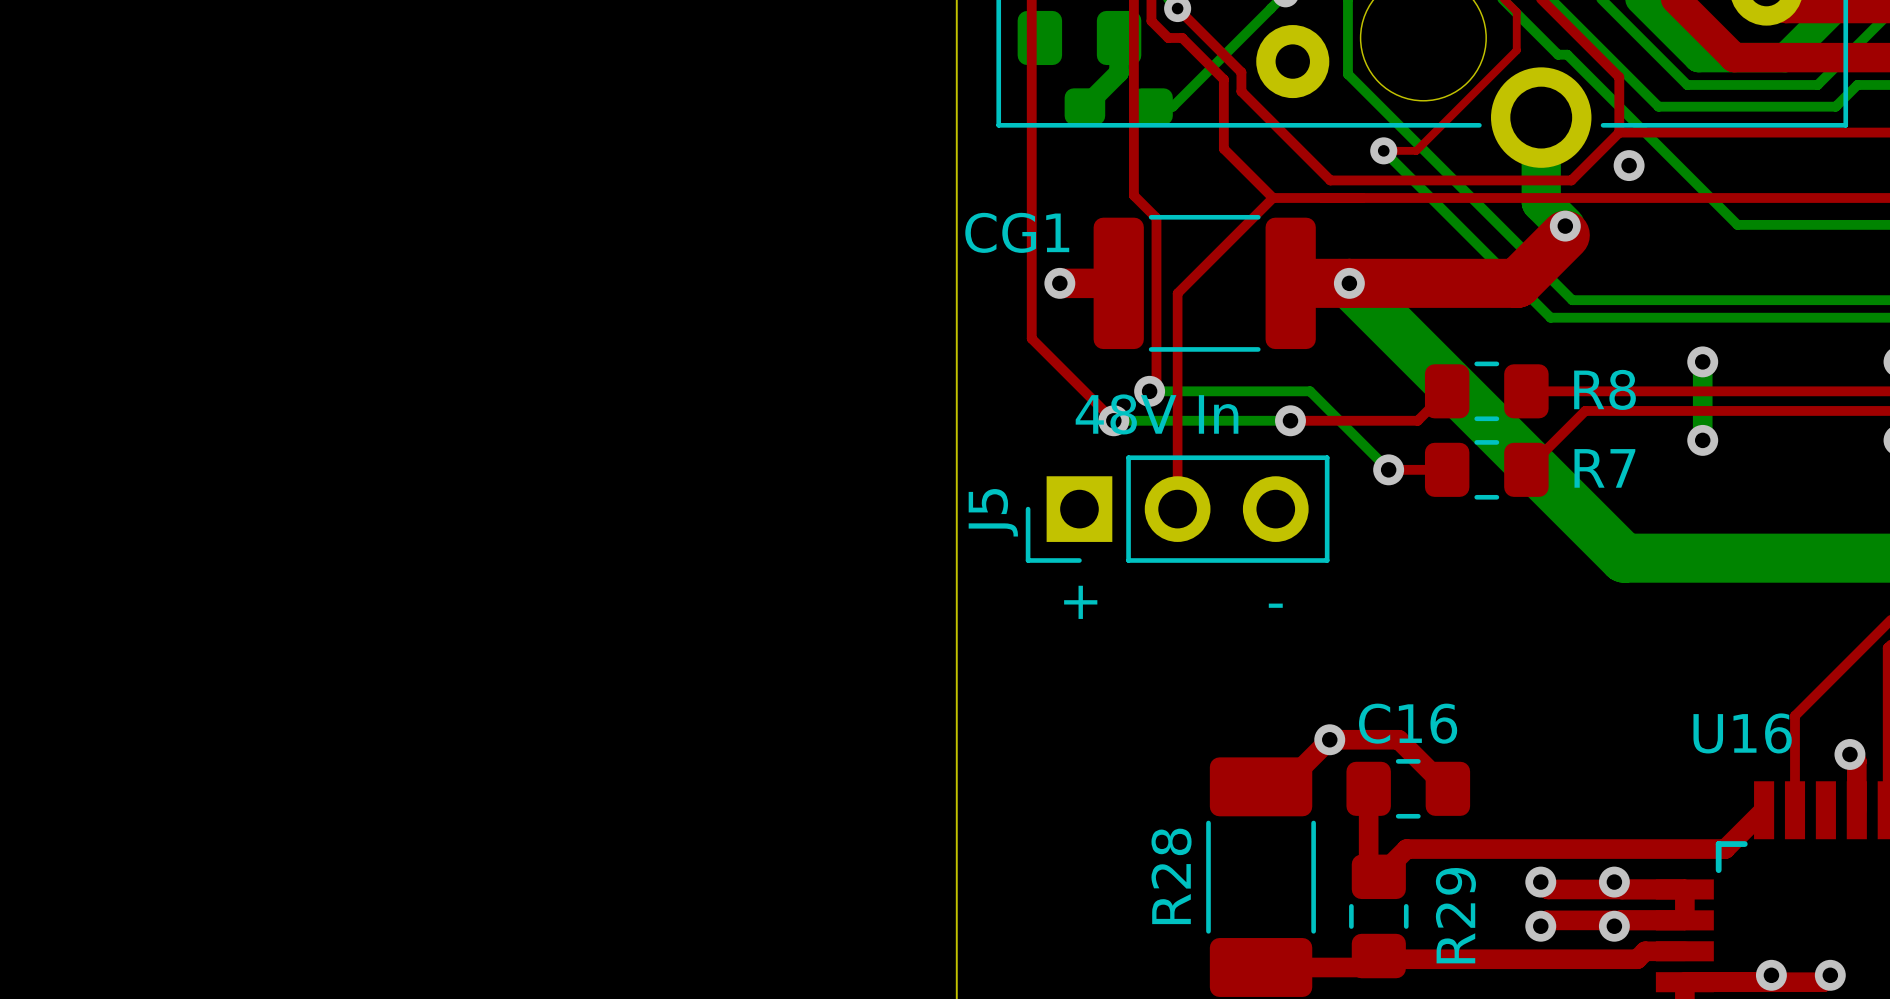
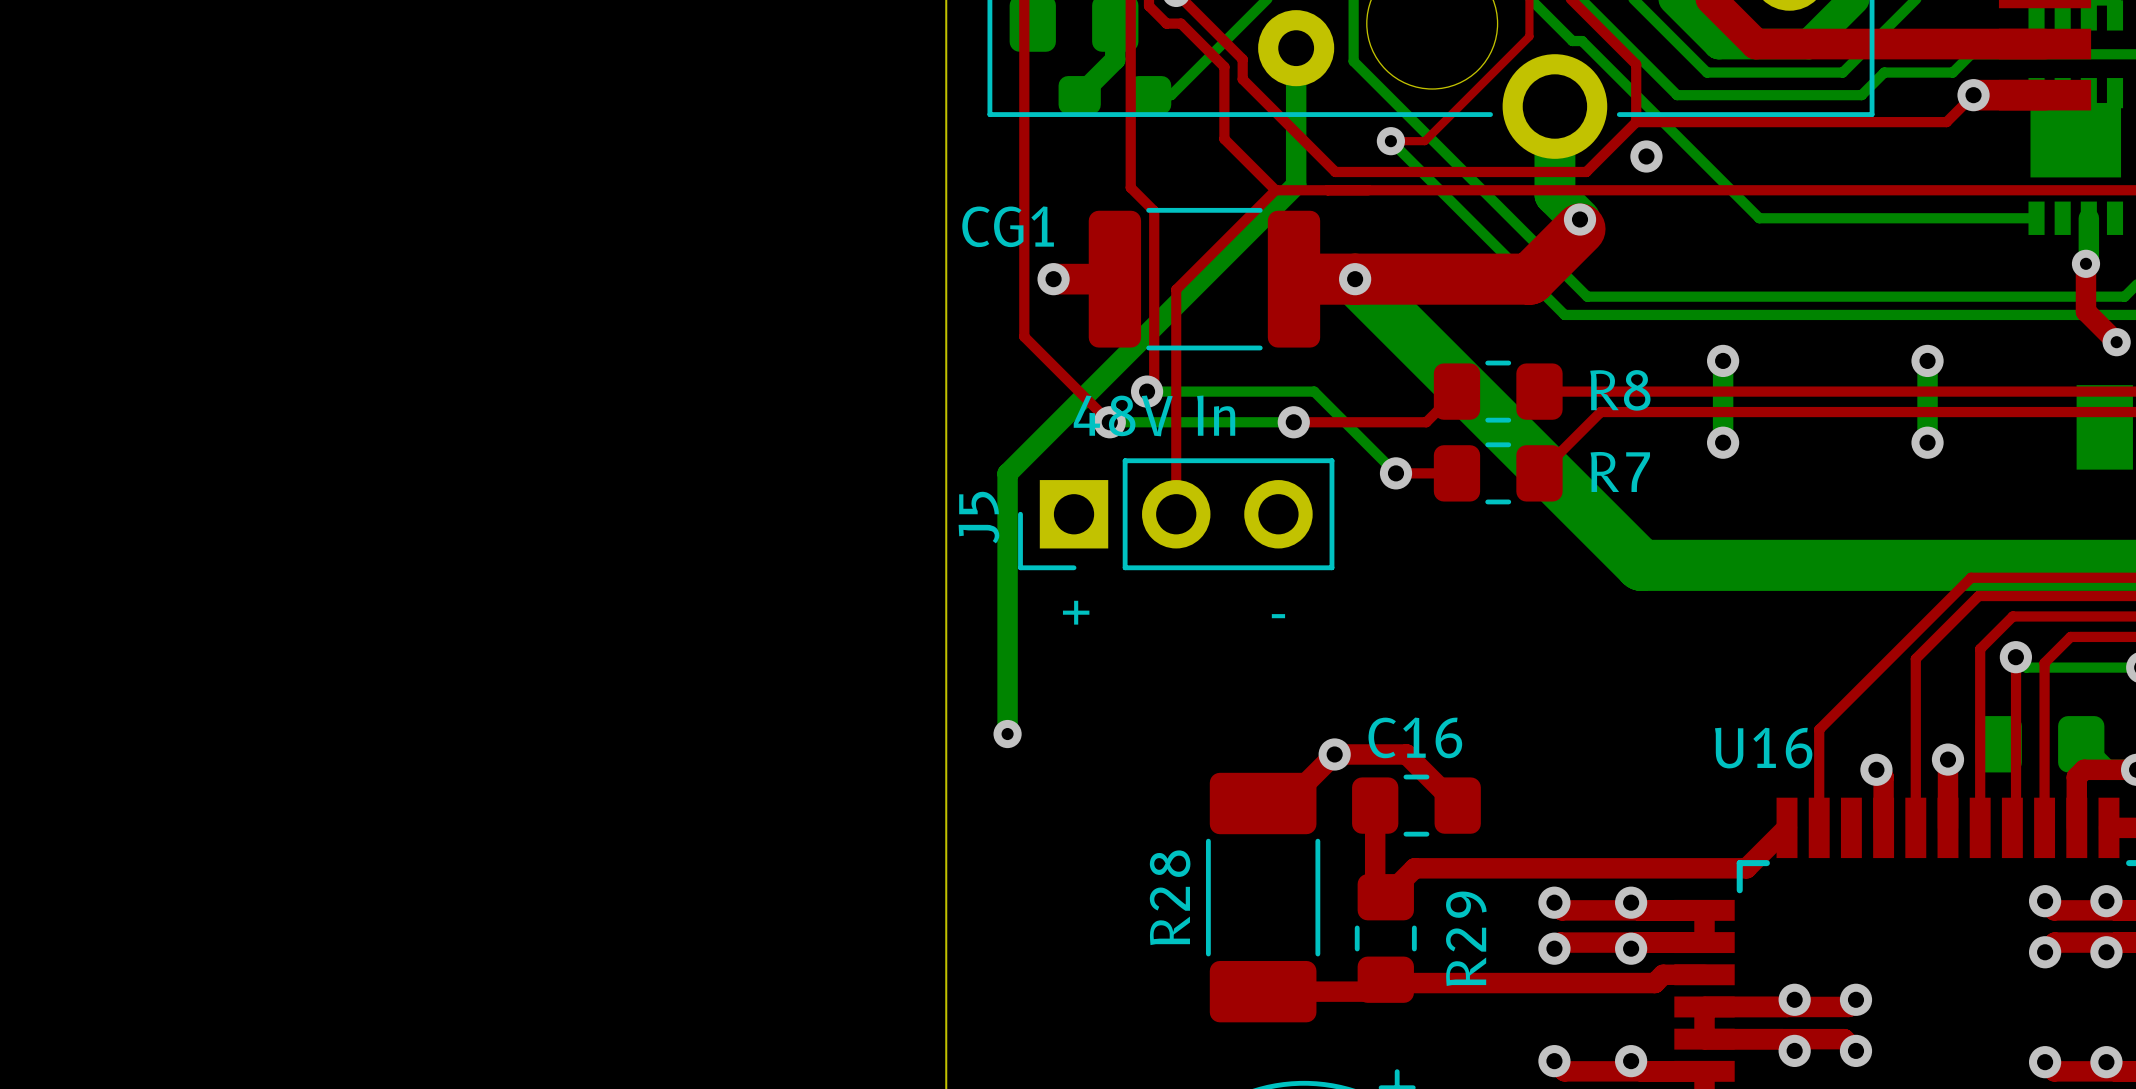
bottom track: none -> (1296, 48) (1296, 185) (1007, 473) (1007, 734)
via: none -> (1007, 734)

